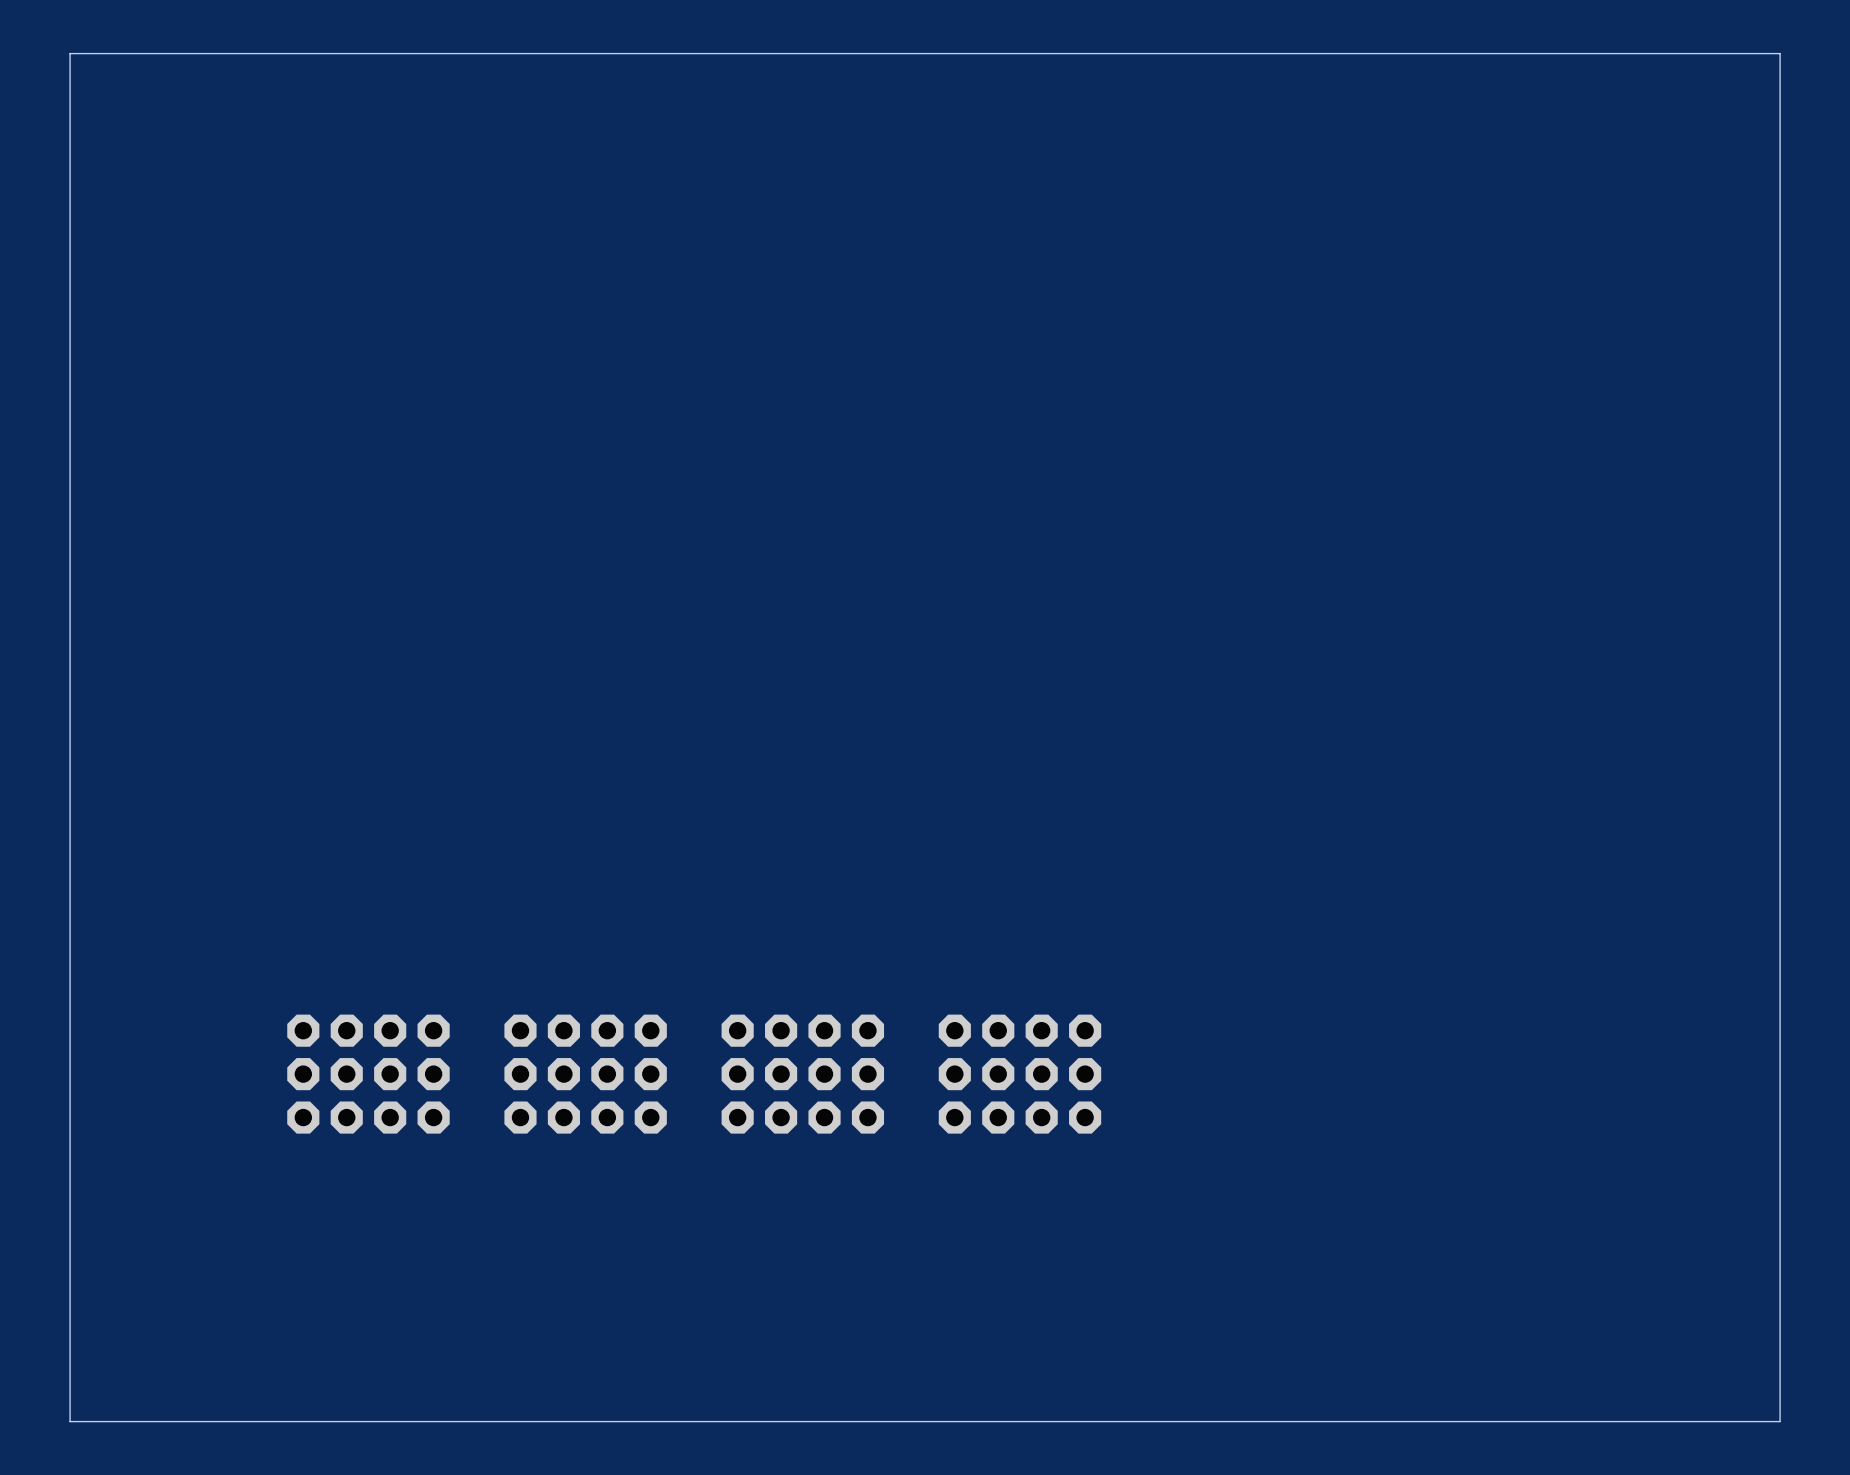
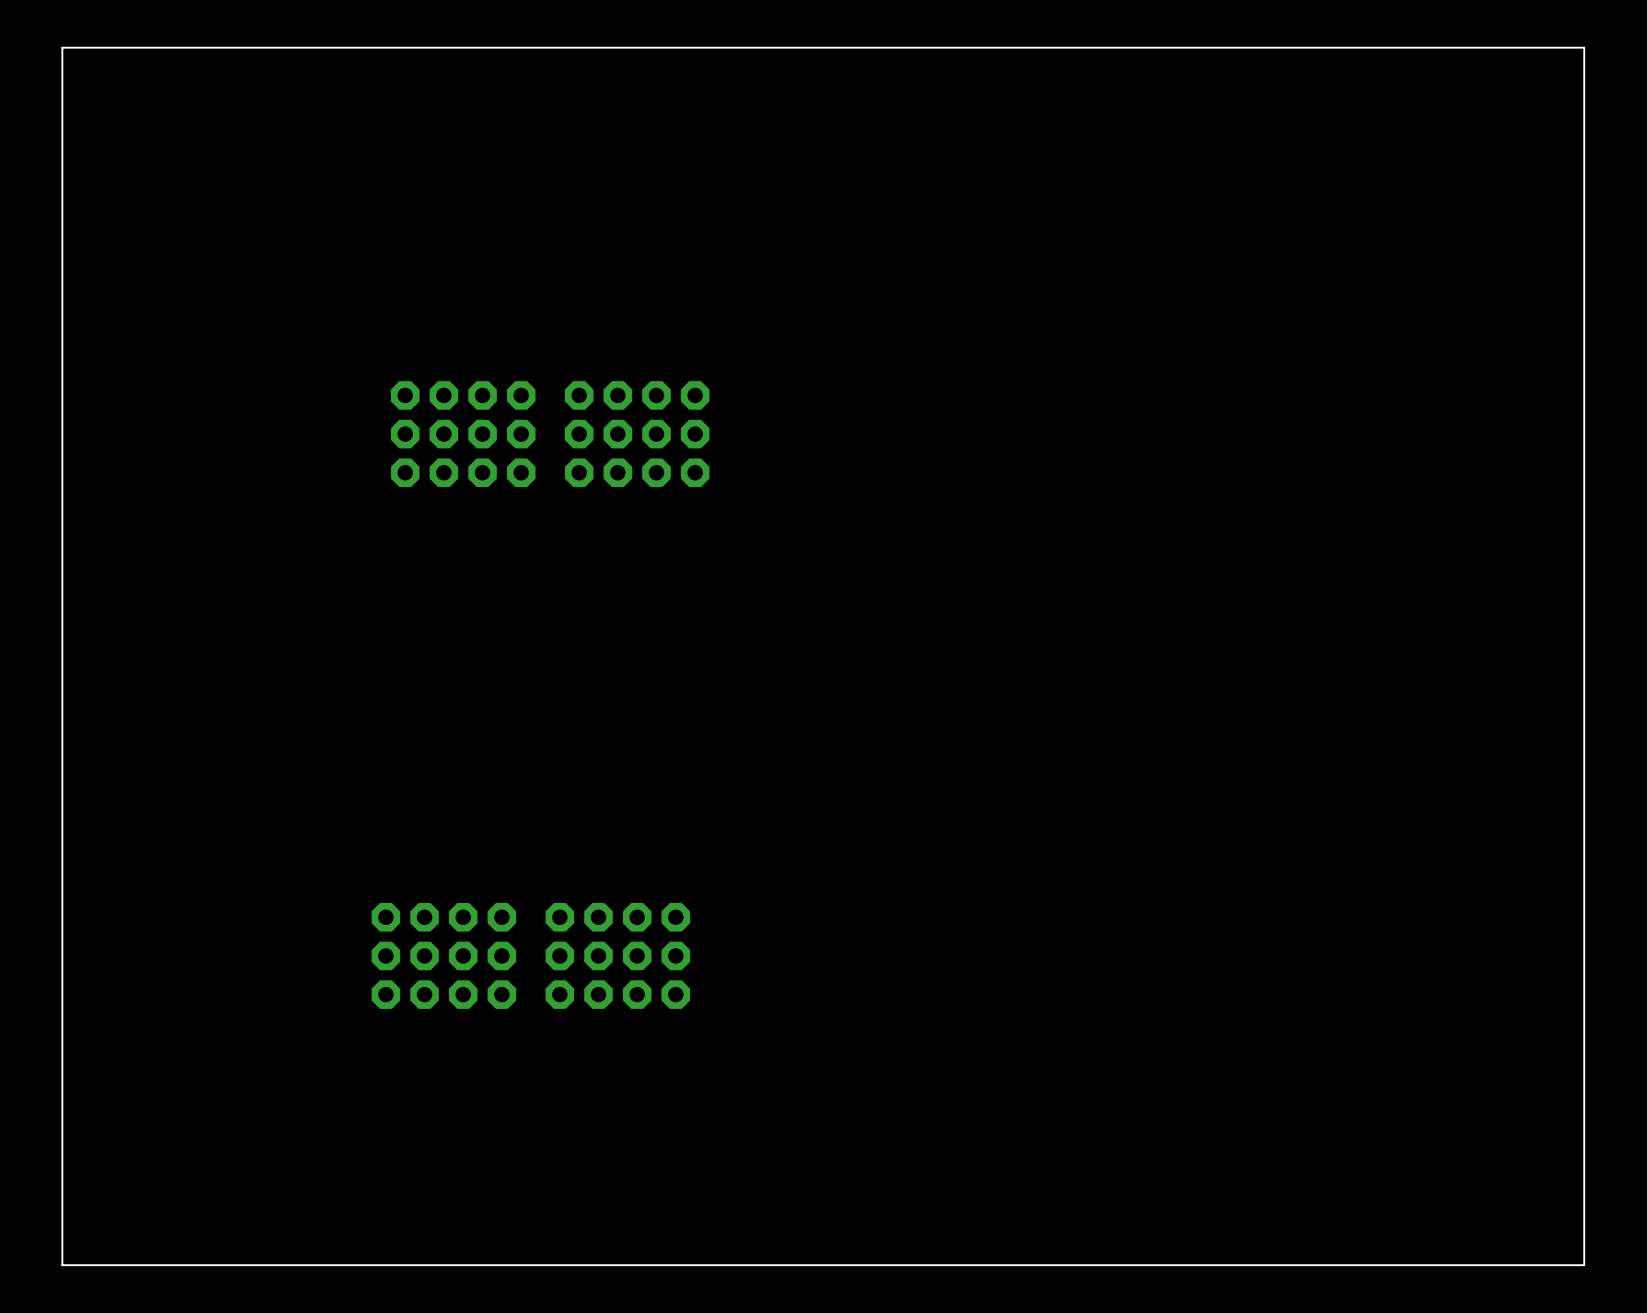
part: none -> (463, 434)
part: none -> (637, 434)
part: (368, 1074) -> none
part: none -> (443, 955)
part: (585, 1074) -> none
part: none -> (617, 955)
part: (802, 1074) -> none
part: (1019, 1074) -> none

